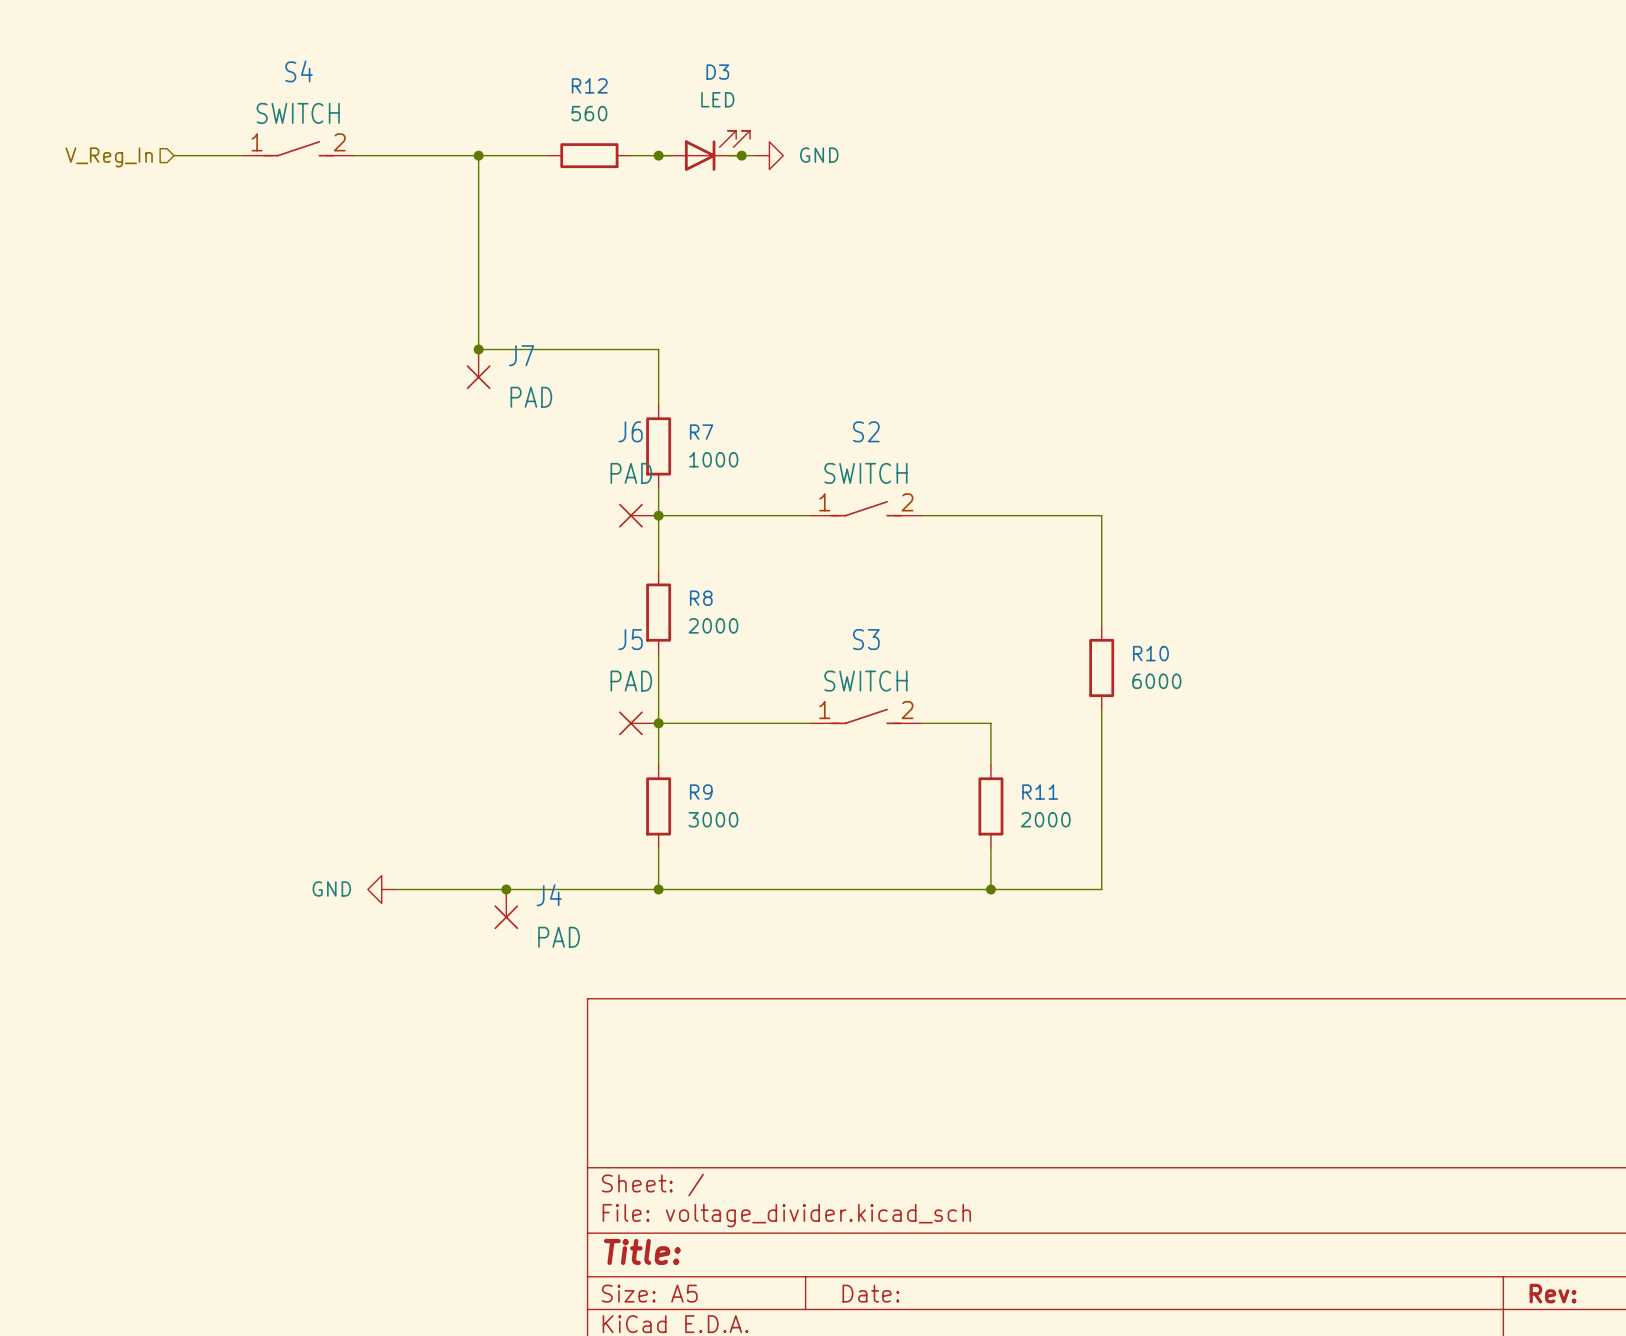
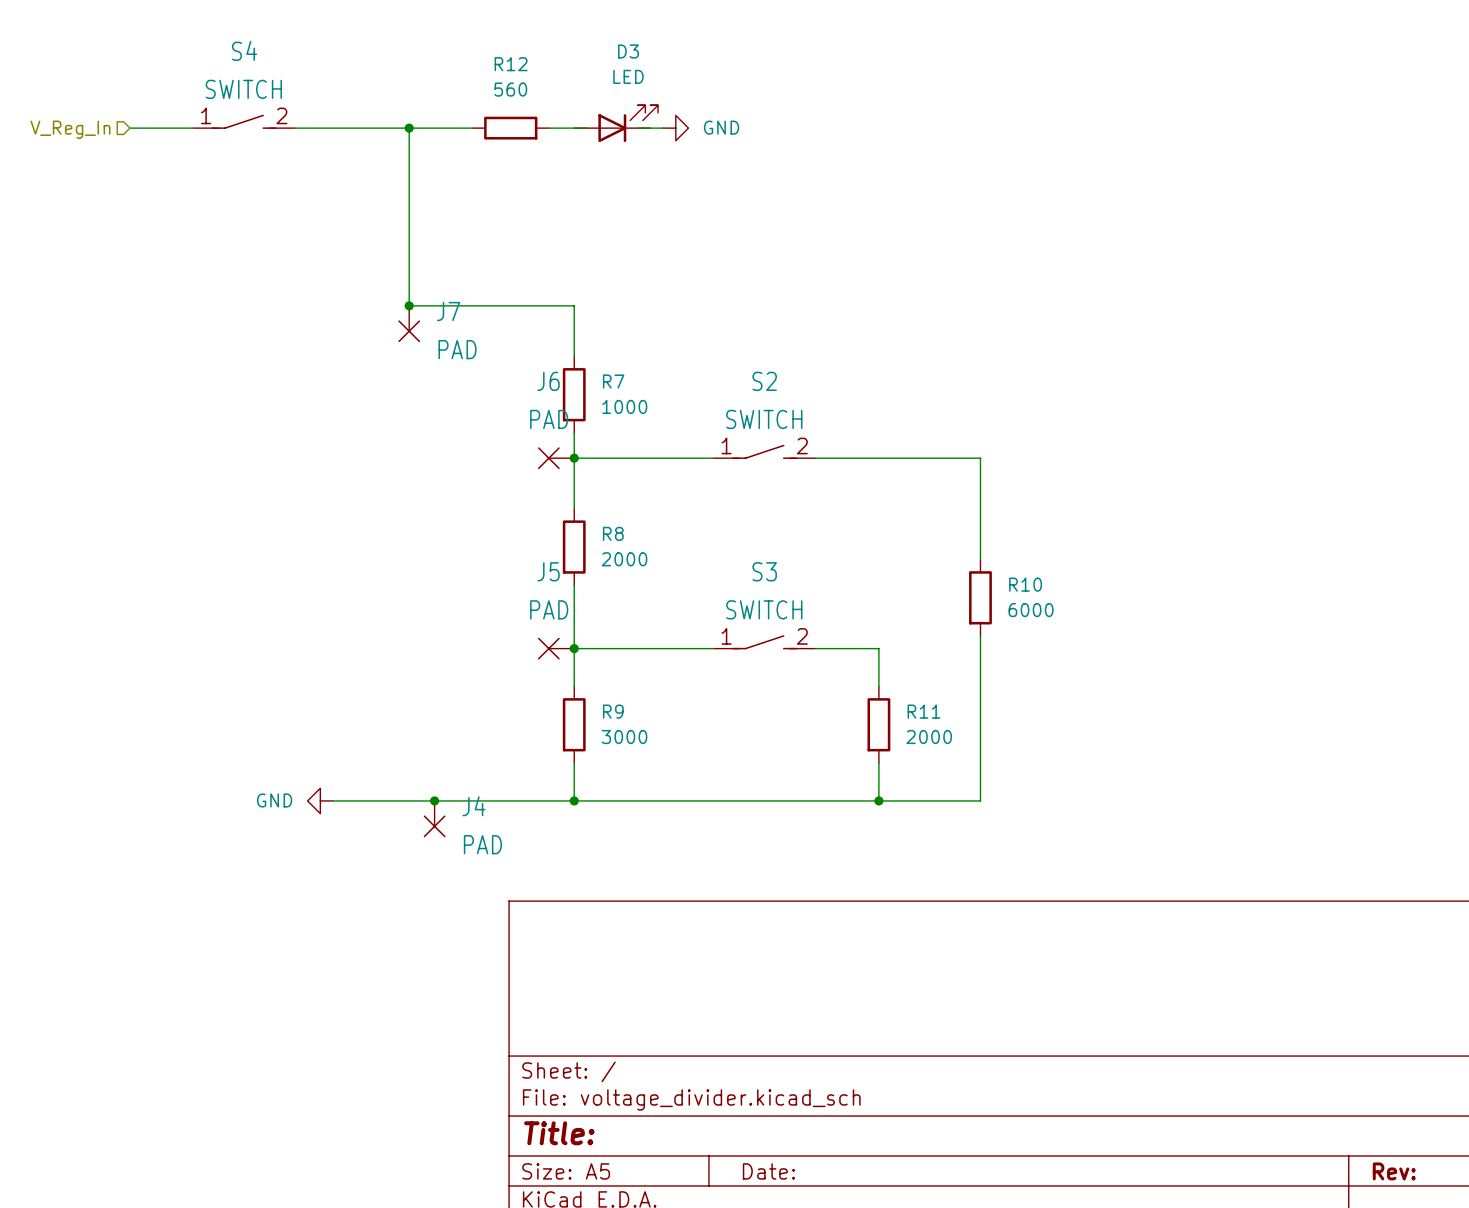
junction: (658, 155) -> none
junction: (741, 155) -> none

